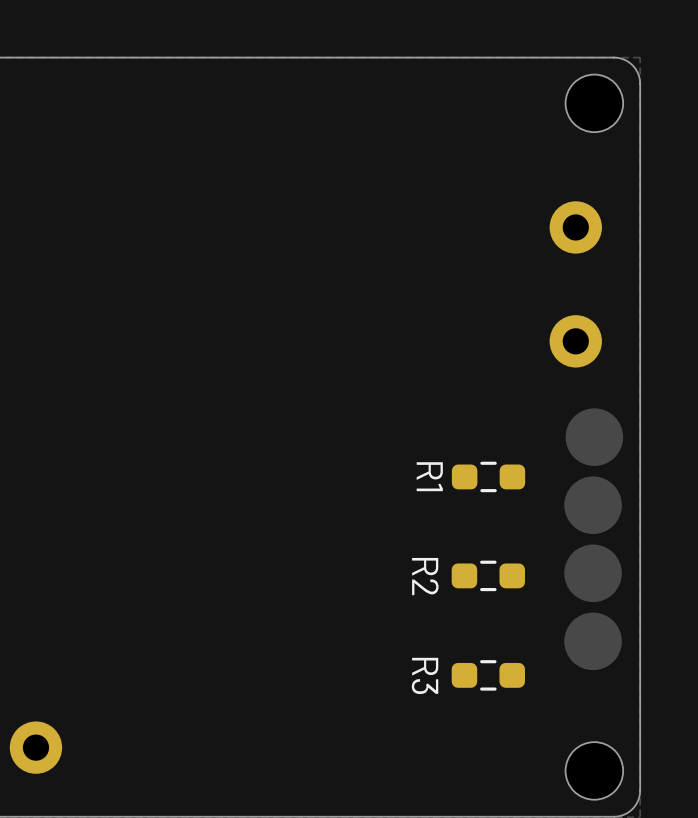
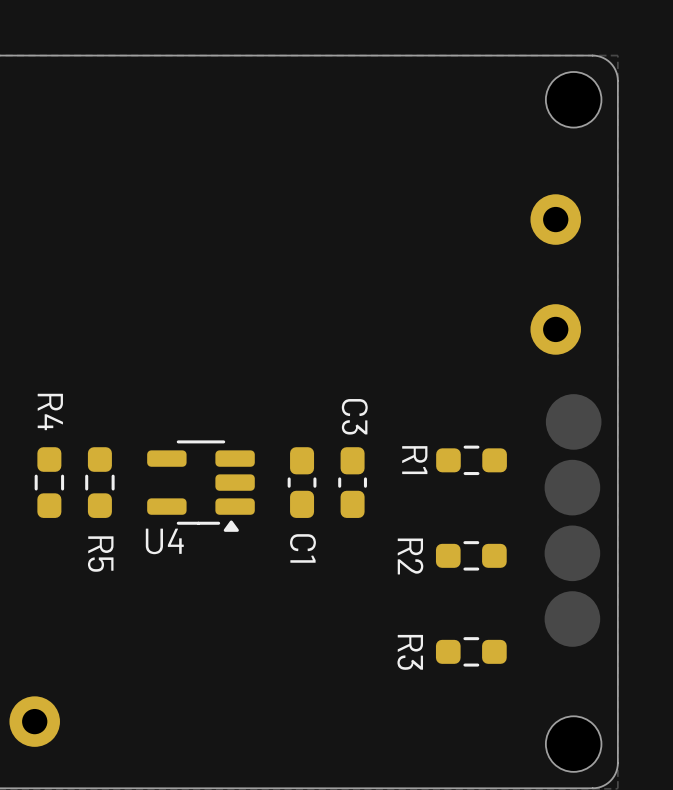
R4: none -> (49, 482)
R5: none -> (99, 482)
C1: none -> (302, 482)
C3: none -> (352, 482)
U4: none -> (200, 486)

